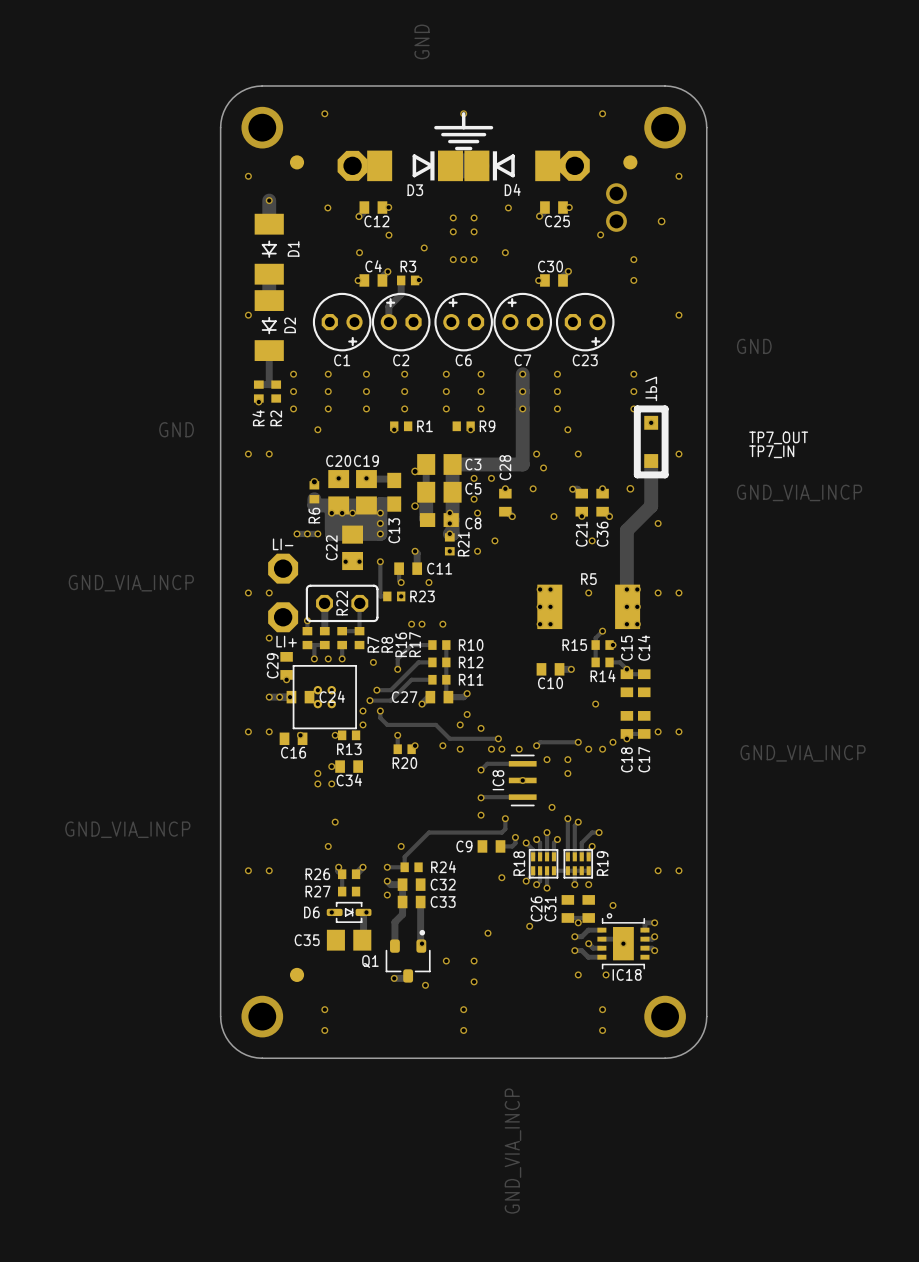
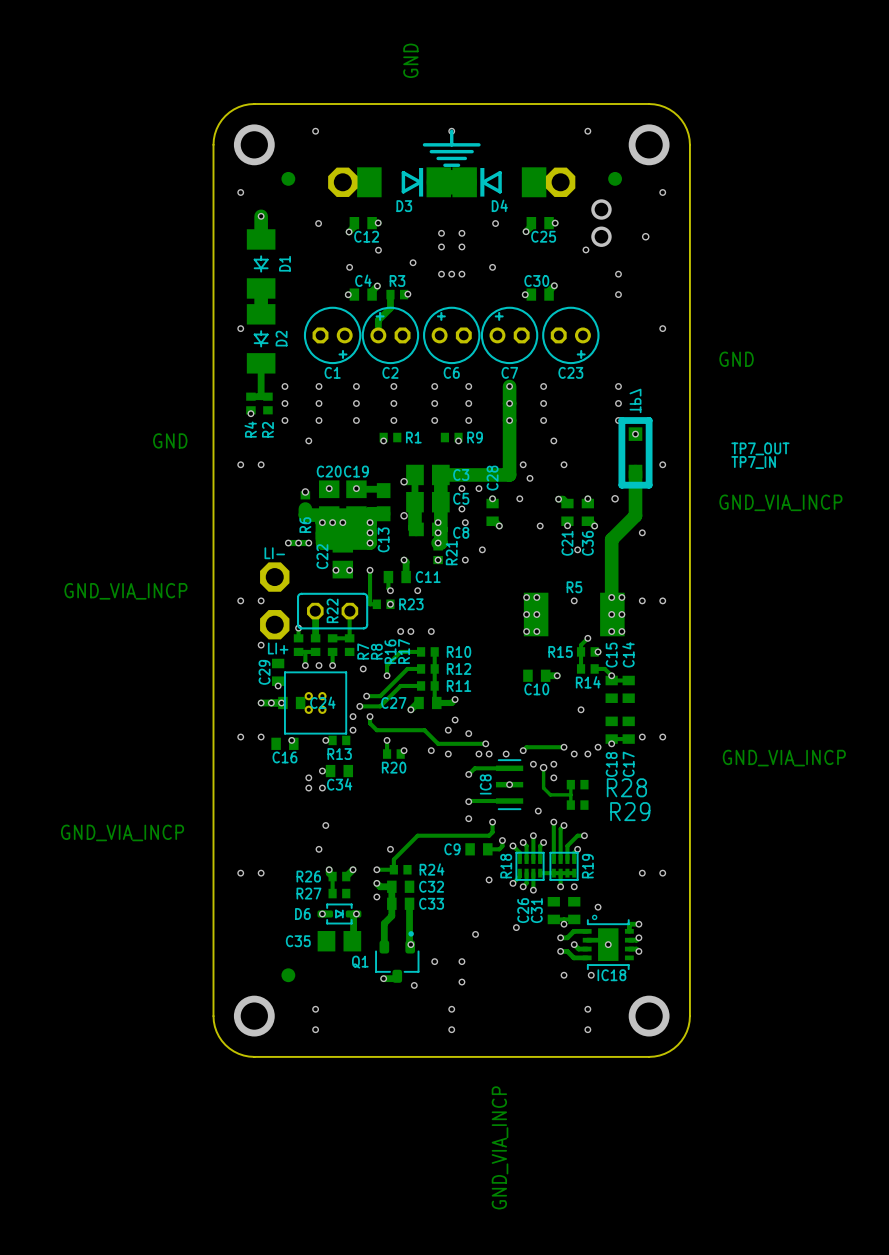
track: none -> (543, 767) (543, 788) (550, 794) (570, 794)
via: none -> (543, 767)
track: none -> (570, 784) (570, 805)
R28: none -> (577, 784)
R29: none -> (577, 805)

